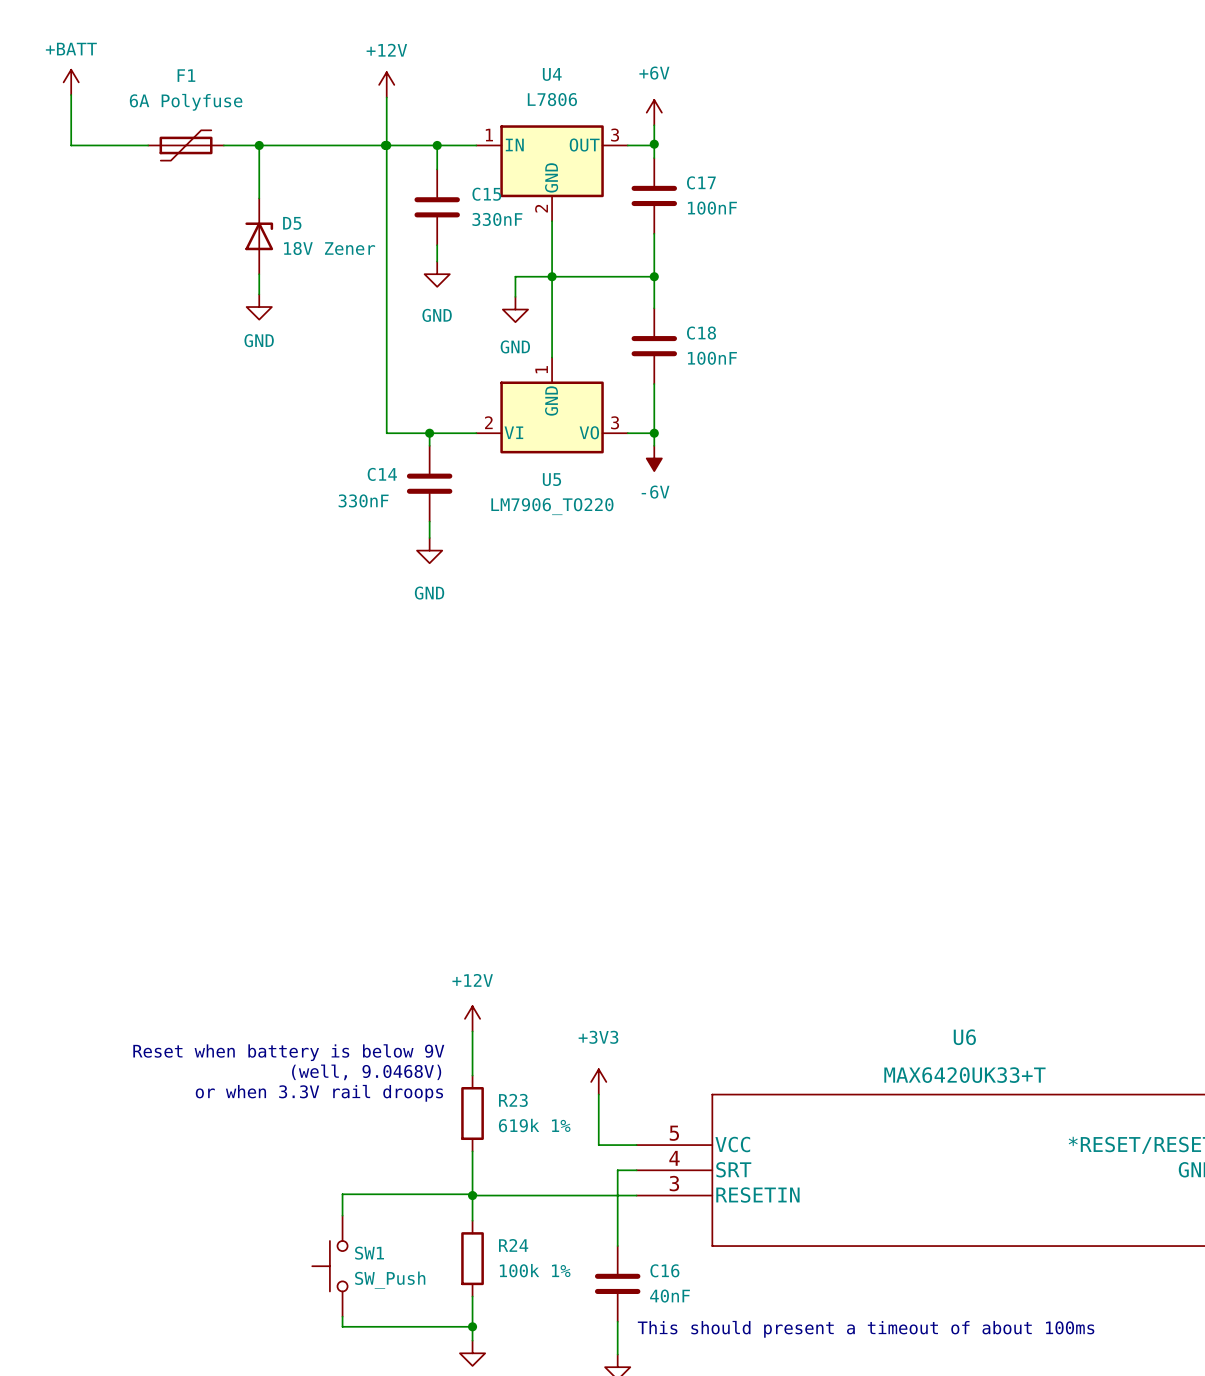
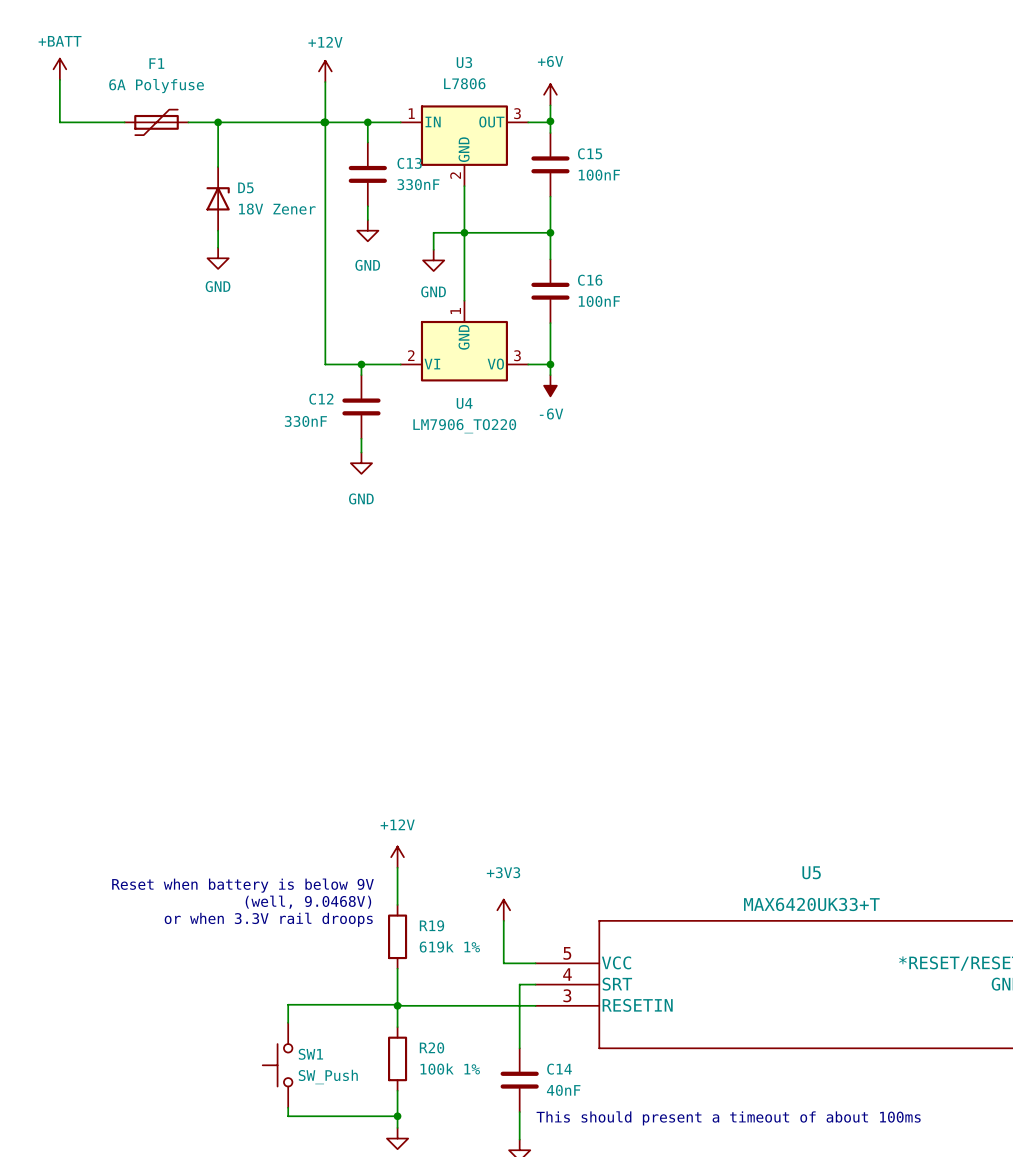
U4 name: U4 (552, 74) -> U3 (464, 62)
C17 name: C17 (701, 182) -> C15 (590, 153)
C15 name: C15 (486, 194) -> C13 (409, 163)
C18 name: C18 (701, 333) -> C16 (590, 280)
C14 name: C14 (382, 474) -> C12 (321, 399)
U5 name: U5 (551, 479) -> U4 (464, 403)
U6 name: U6 (964, 1037) -> U5 (811, 872)
R23 name: R23 (513, 1100) -> R19 (431, 925)
R24 name: R24 (513, 1245) -> R20 (431, 1047)
C16 name: C16 (664, 1270) -> C14 (559, 1069)

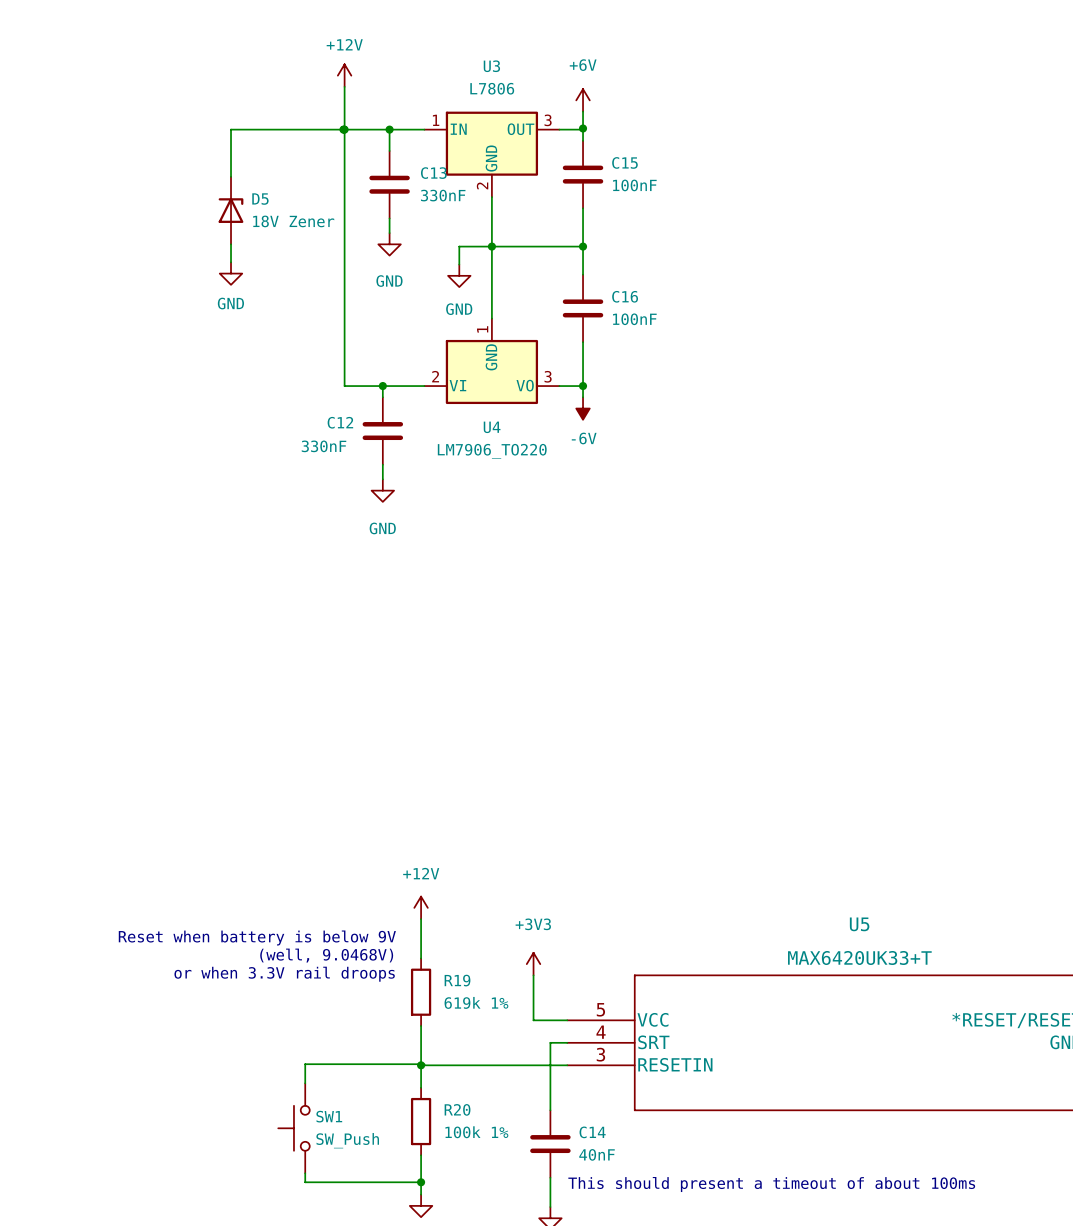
power symbol: +BATT (59, 69) -> none
wire: (59, 79) (59, 122) (124, 122) -> none
F1: 6A Polyfuse (156, 122) -> none
wire: (188, 122) (218, 122) -> none
junction: (218, 122) -> none

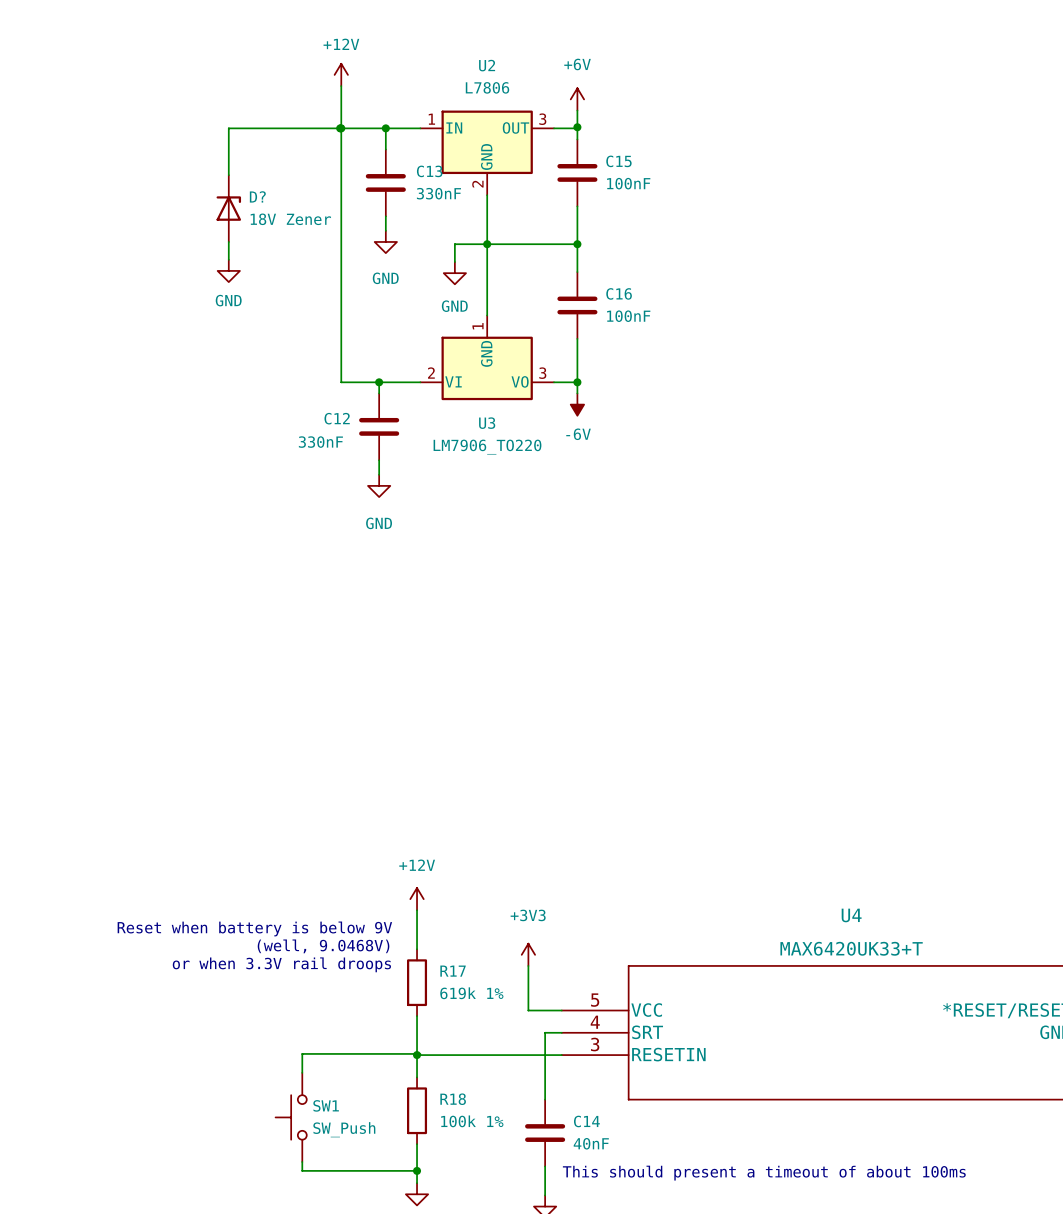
U3 name: U3 (491, 66) -> U2 (487, 65)
D5 name: D5 (260, 199) -> D? (257, 196)
U4 name: U4 (492, 427) -> U3 (487, 423)
U5 name: U5 (859, 924) -> U4 (851, 915)
R19 name: R19 (457, 980) -> R17 (453, 971)
R20 name: R20 (457, 1109) -> R18 (453, 1099)

